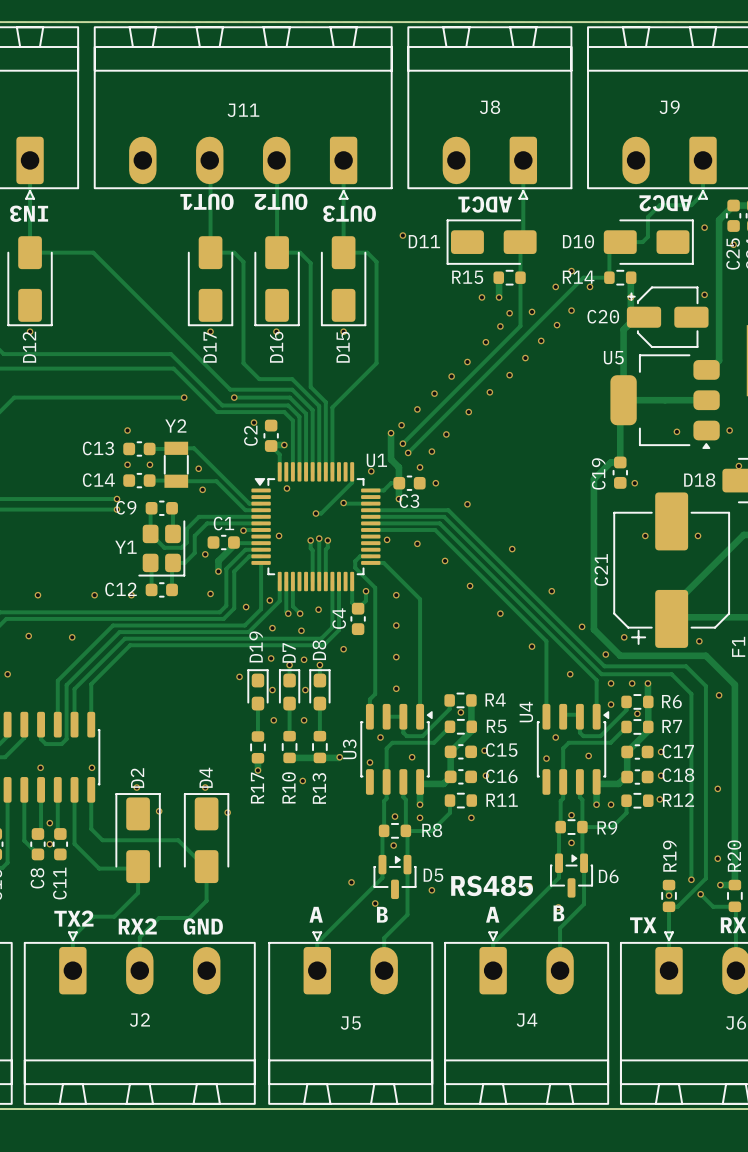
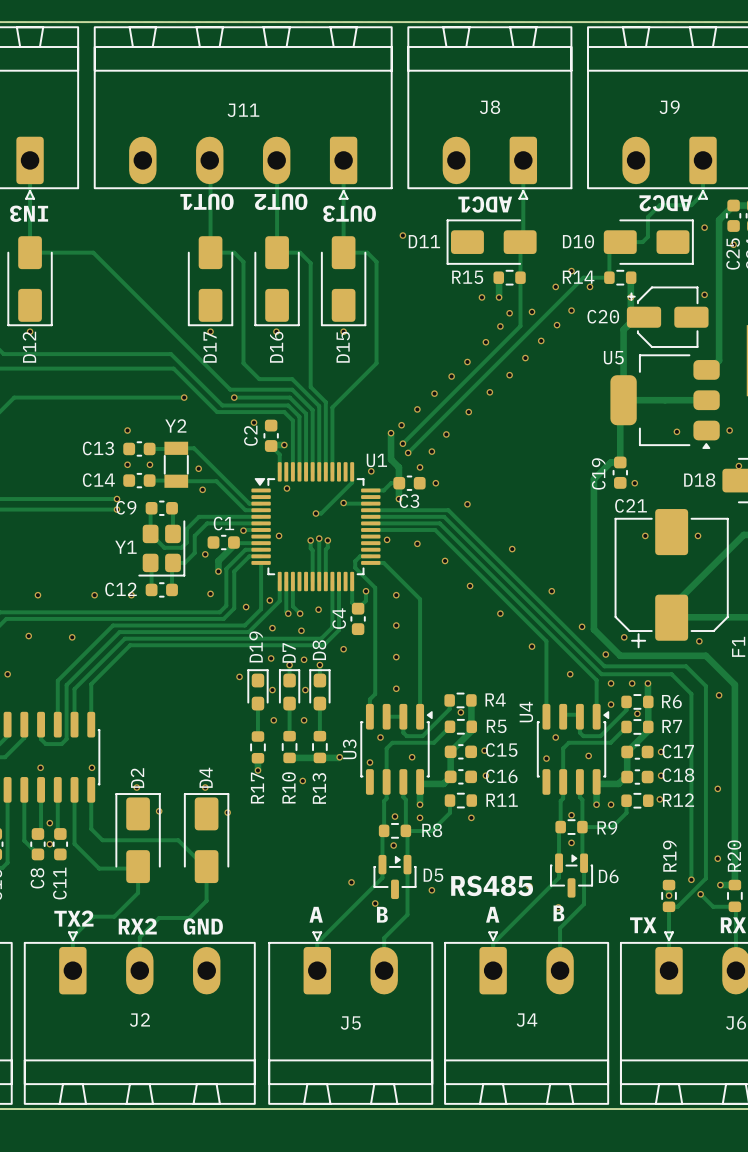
C21 footprint: [613, 492, 730, 648] -> [614, 509, 729, 649]
C21 name position: C21 (601, 569) -> C21 (631, 505)

